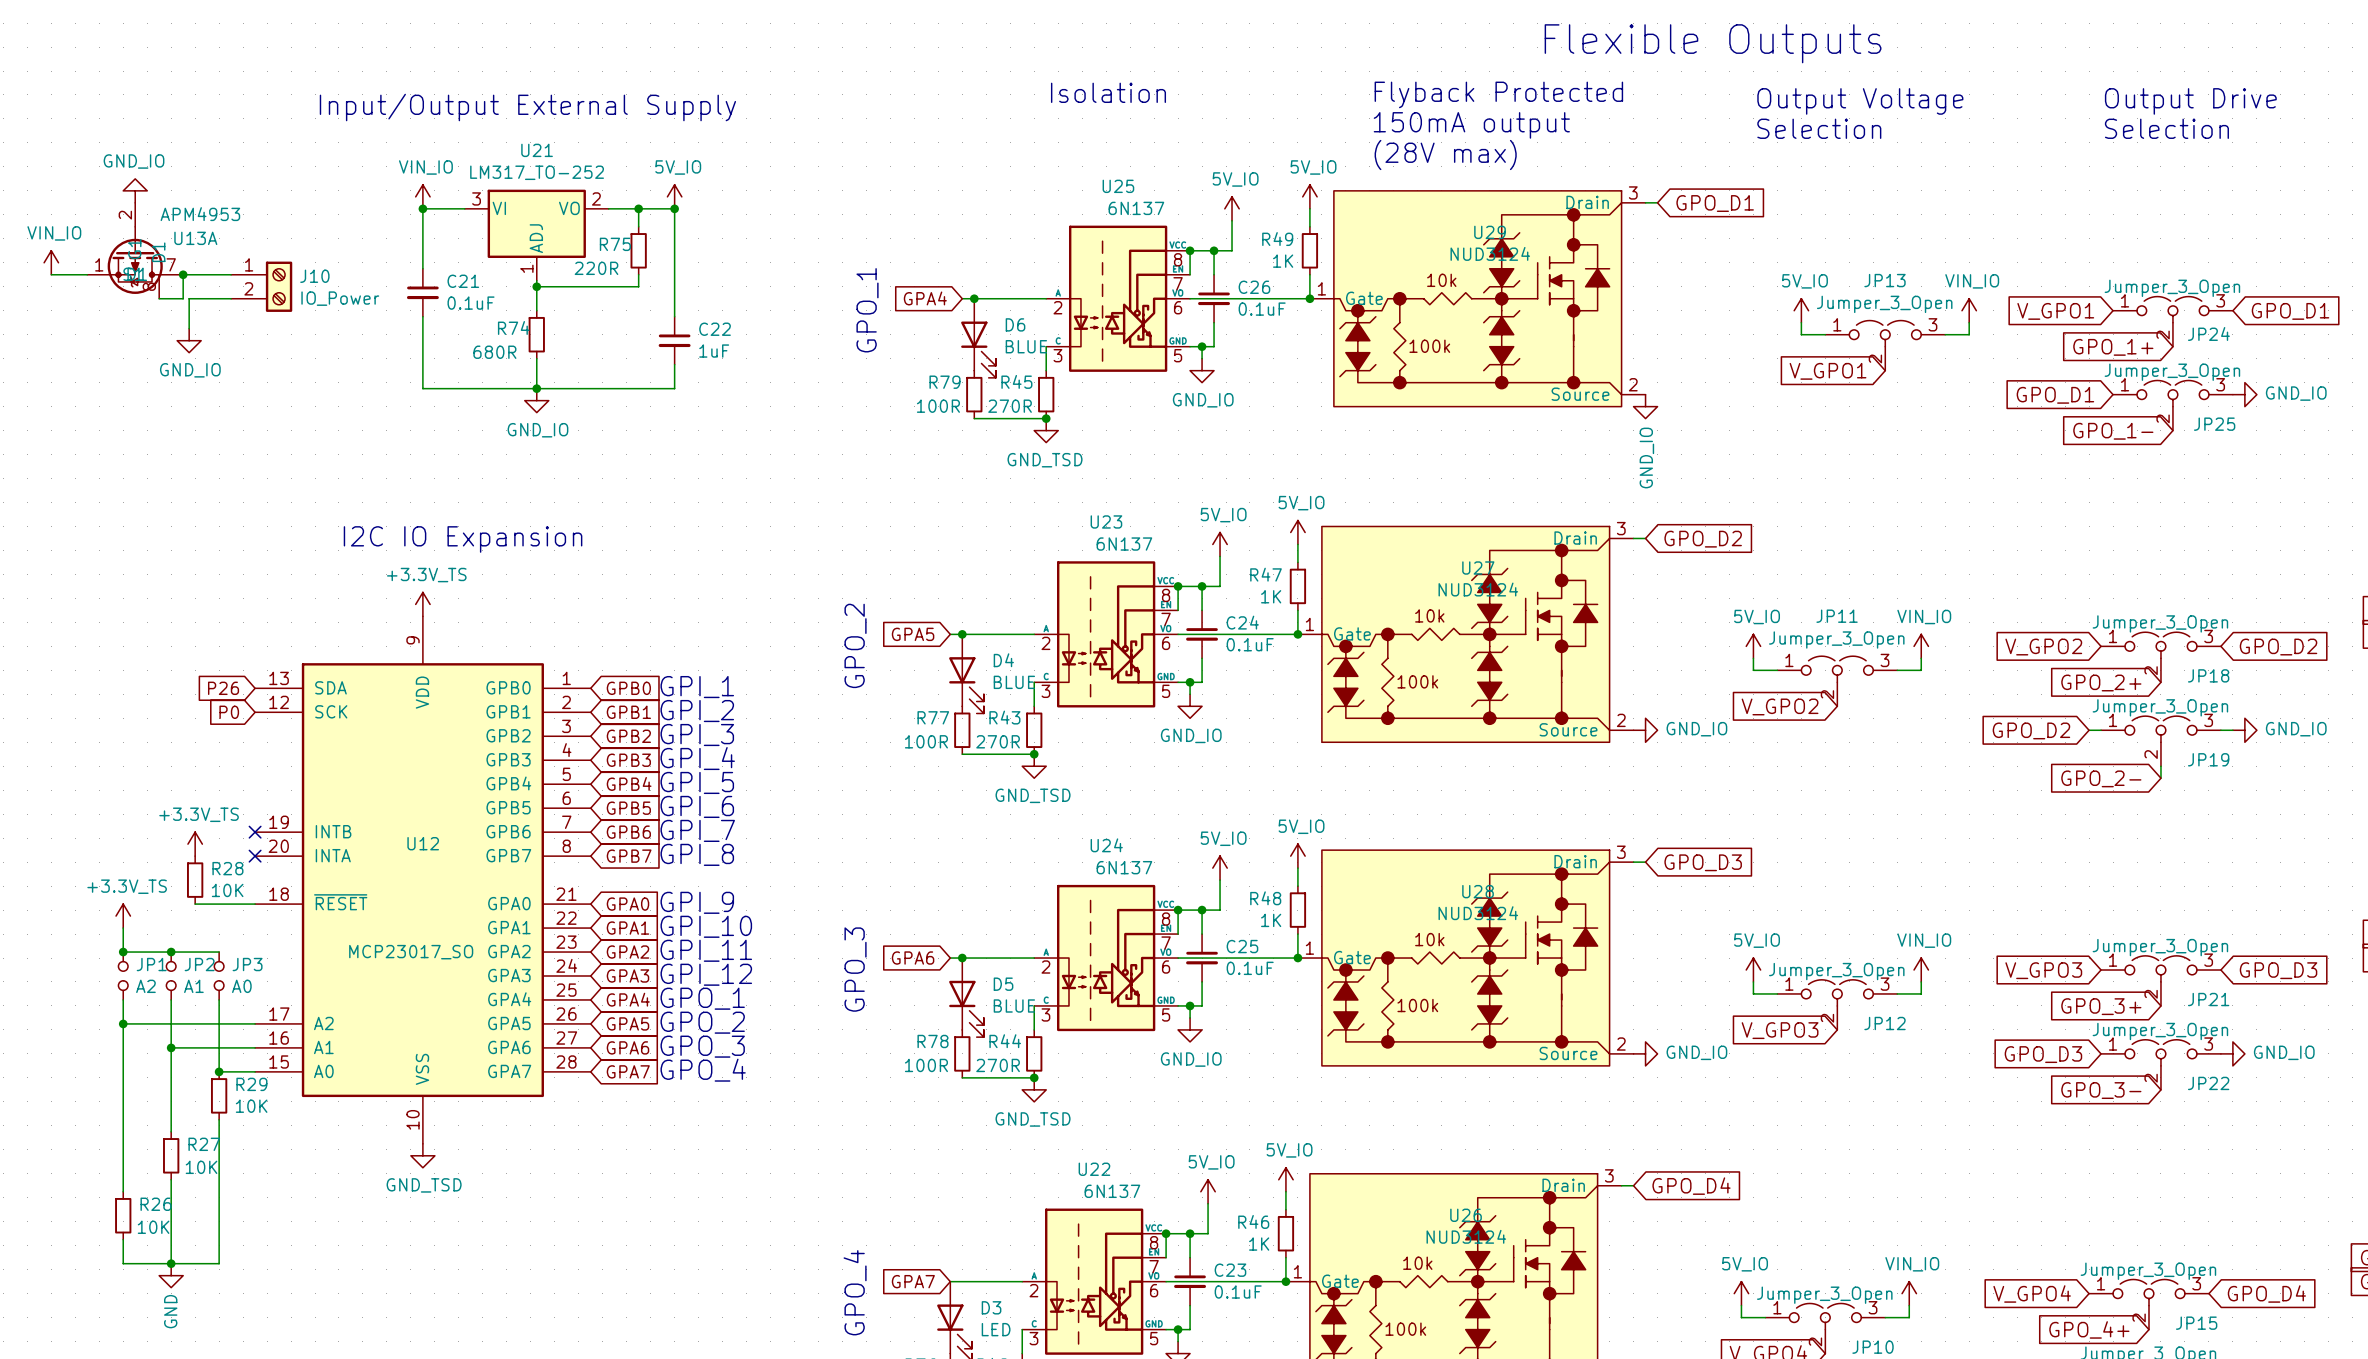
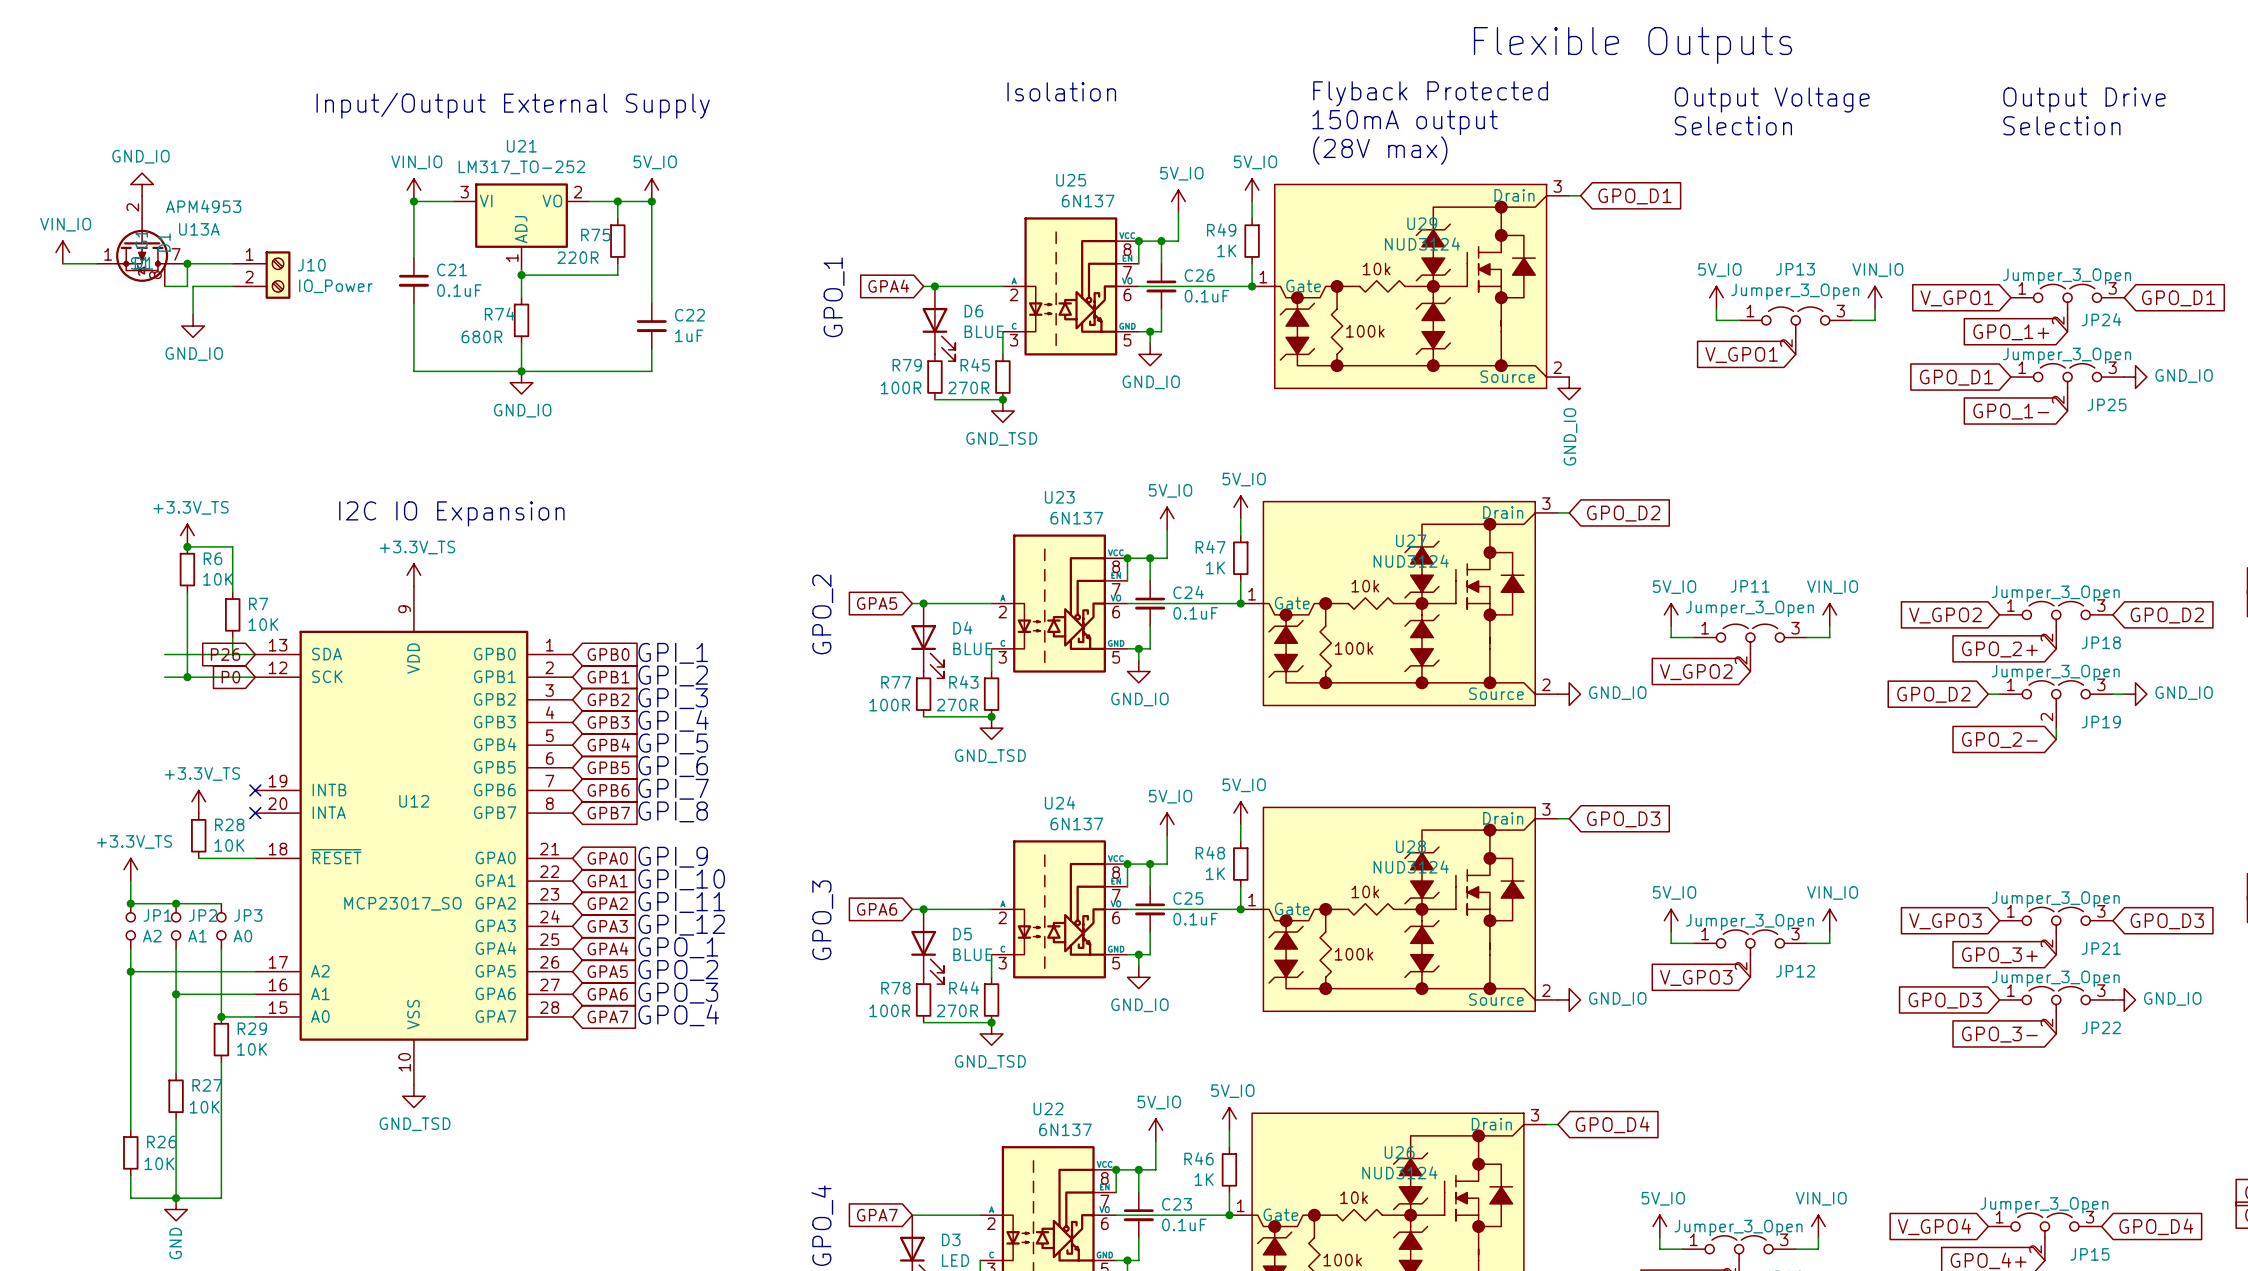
power symbol: none -> +3.3V_TS (187, 535)
wire: none -> (187, 546) (232, 546) (232, 592)
junction: none -> (187, 546)
R6: none -> 10K (187, 569)
wire: none -> (187, 592) (187, 677)
R7: none -> 10K (232, 614)
wire: none -> (232, 637) (232, 654)
wire: none -> (164, 654) (255, 654)
wire: none -> (164, 677) (255, 677)
junction: none -> (187, 677)

